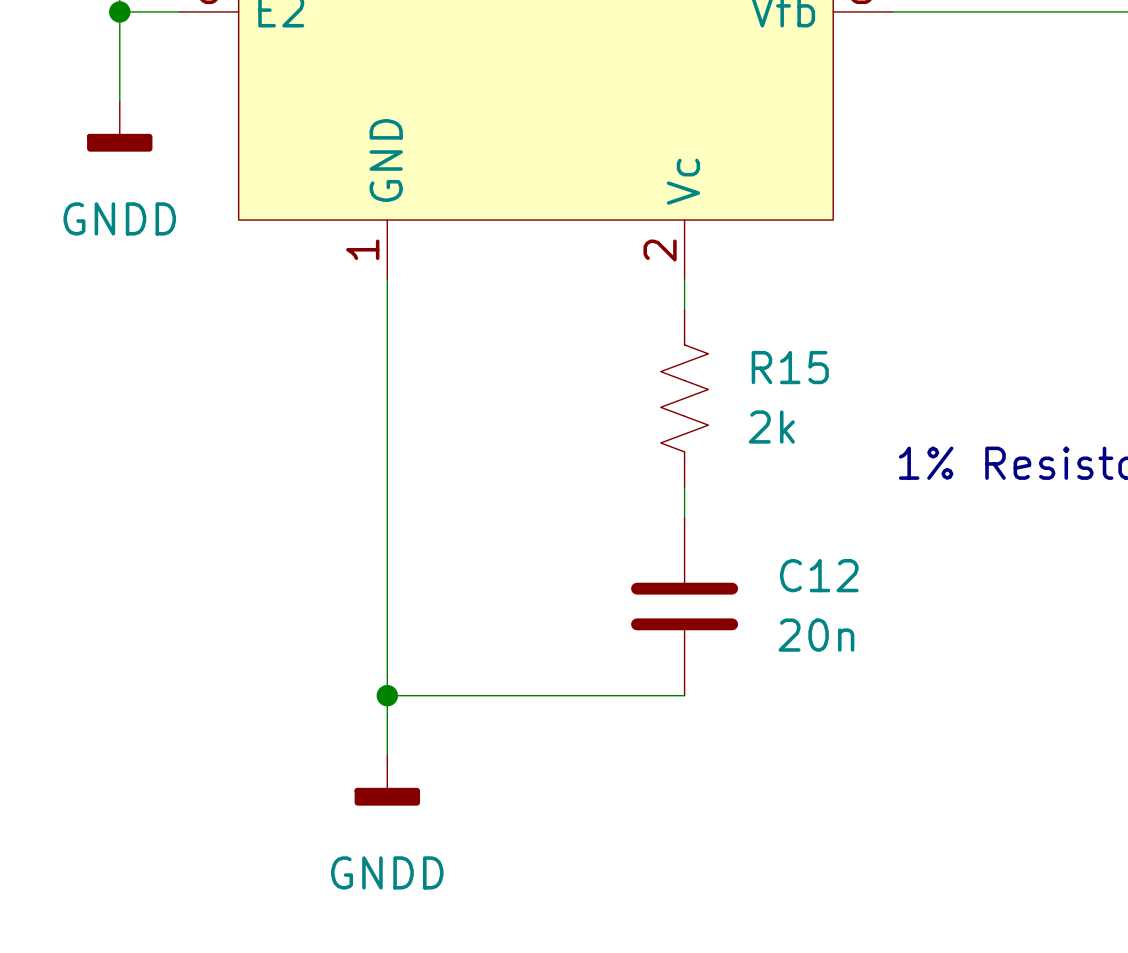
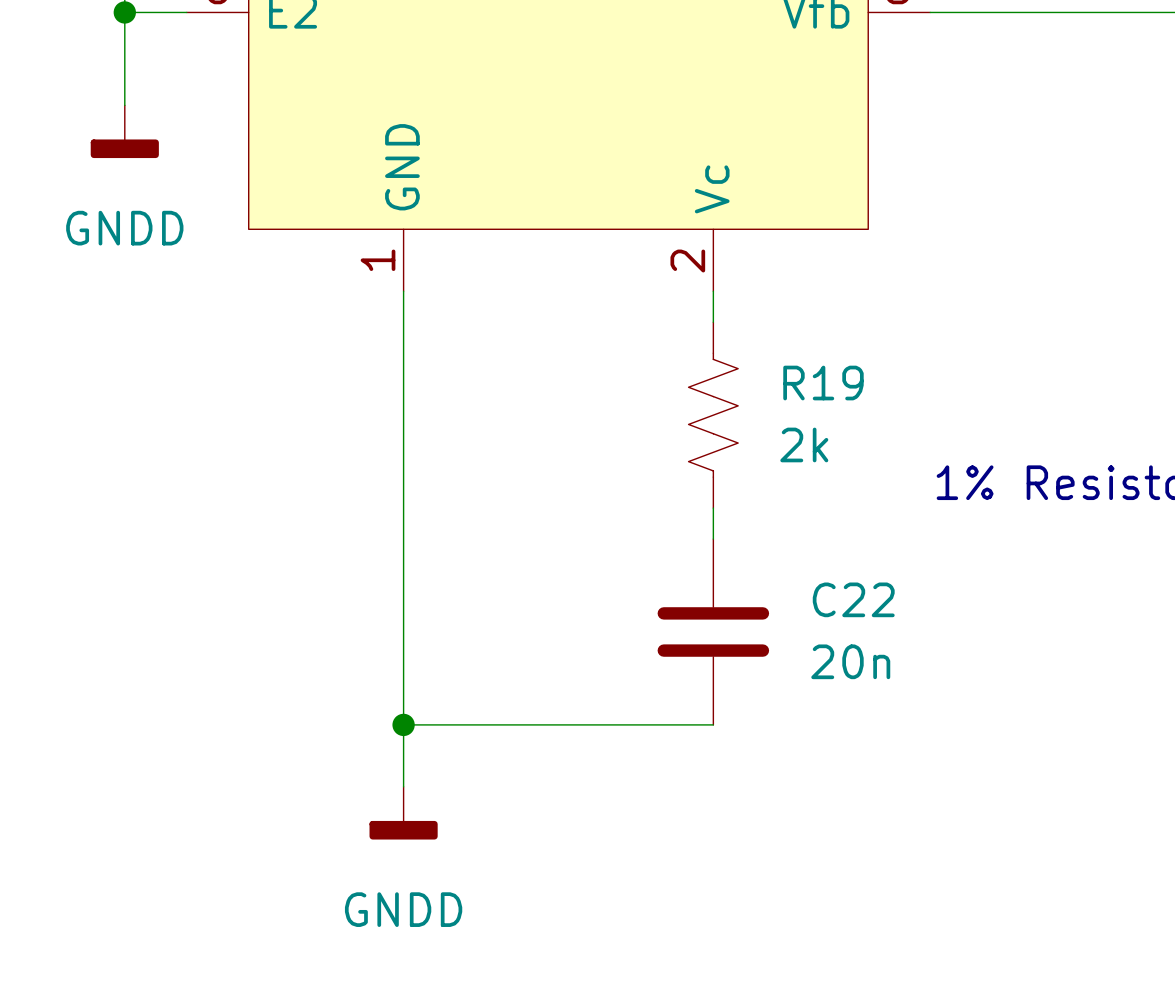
R15 name: R15 (790, 367) -> R19 (823, 383)
C12 name: C12 (819, 575) -> C22 (853, 599)

